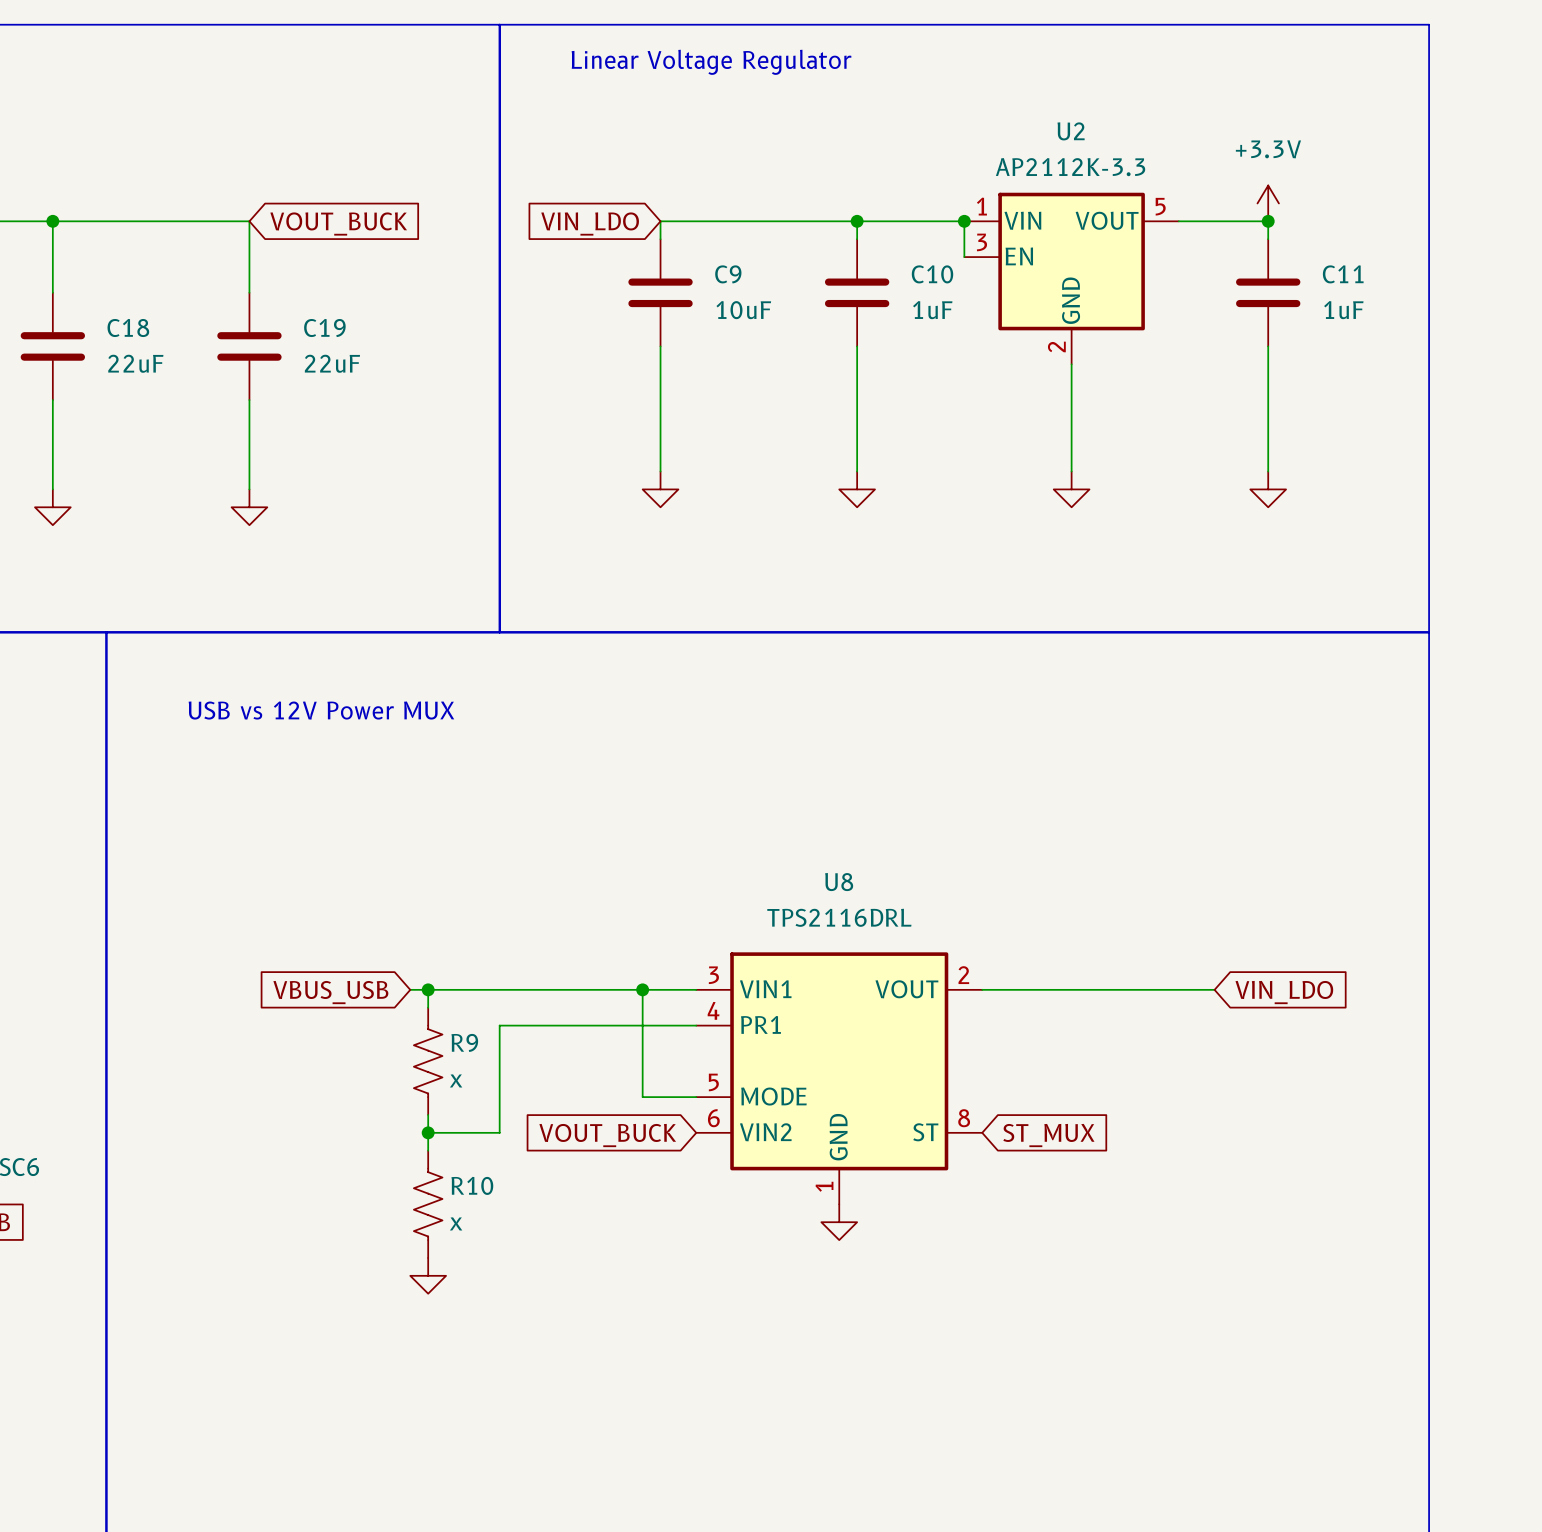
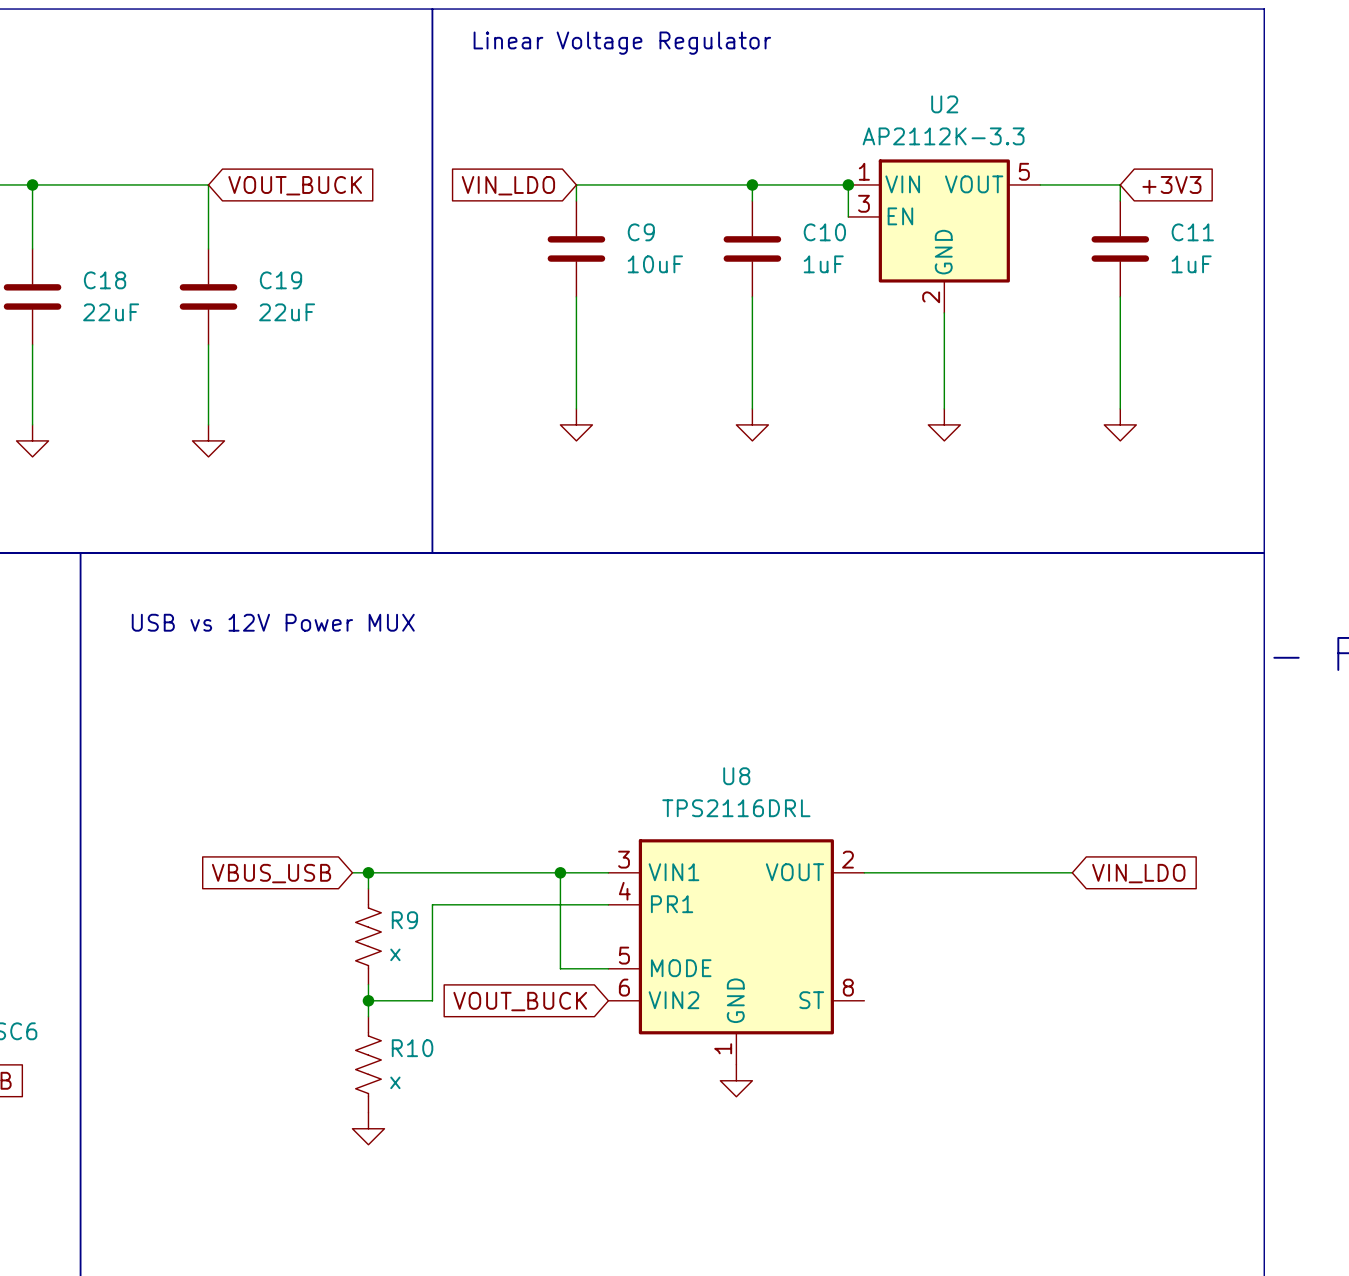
power symbol: +3.3V (1268, 203) -> none
junction: (1268, 221) -> none
global label: none -> +3V3 (1171, 184)
global label: ST_MUX (1048, 1135) -> none

